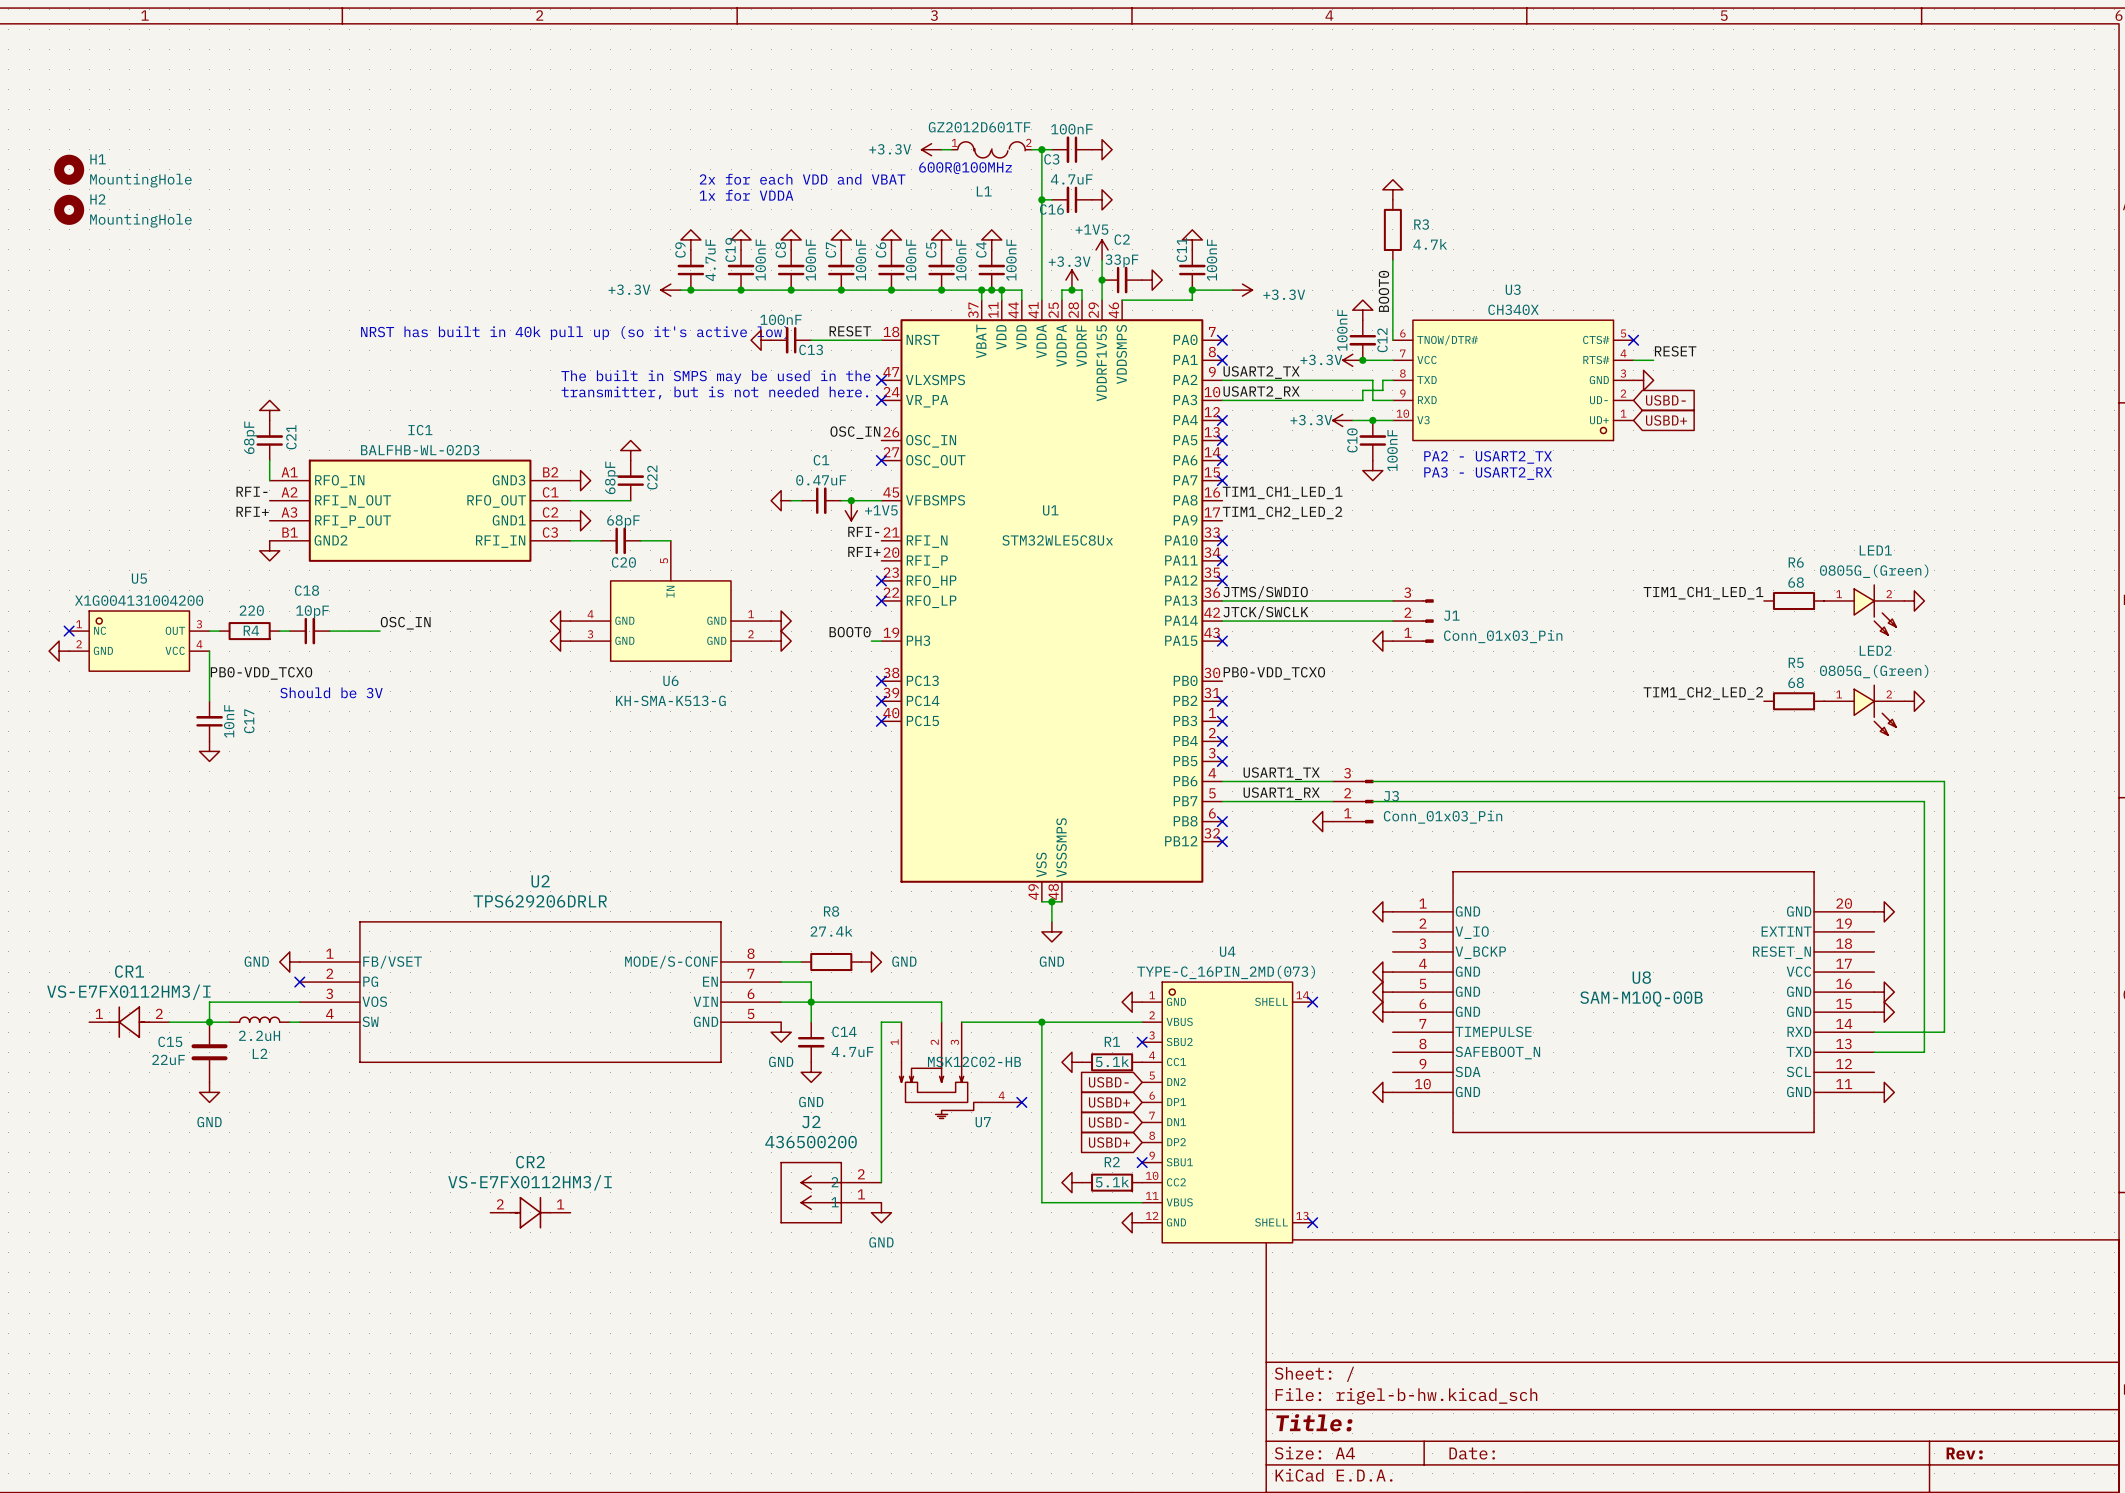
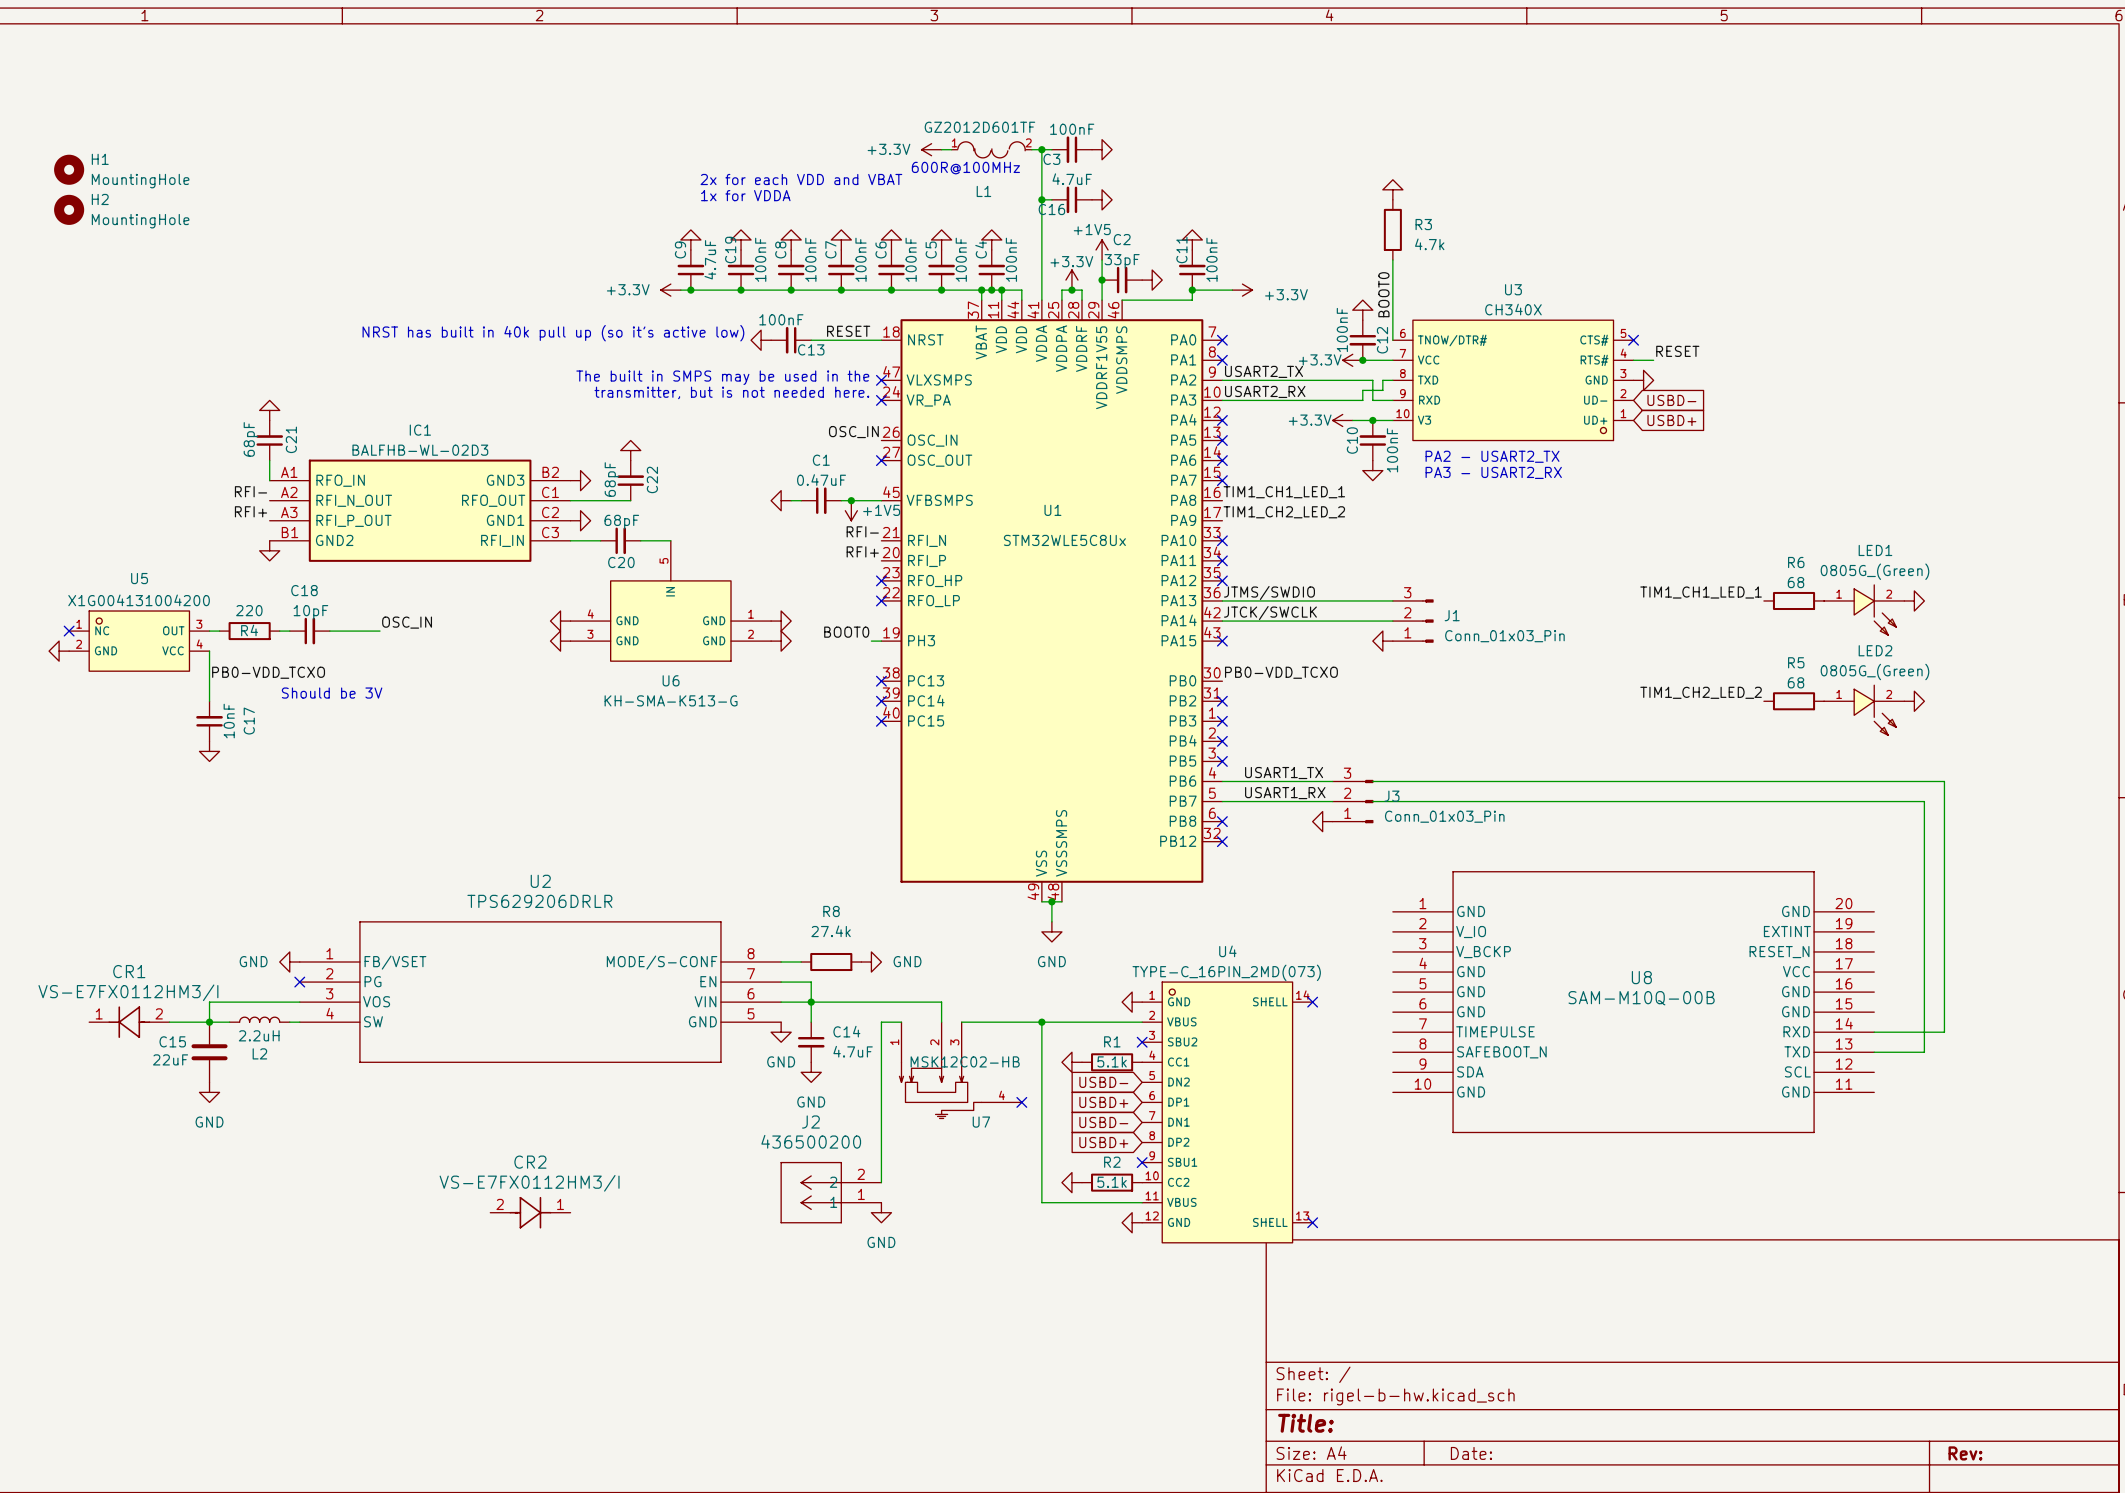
power symbol: (1382, 911) -> none
power symbol: (1884, 911) -> none
power symbol: (1382, 972) -> none
power symbol: (1382, 992) -> none
power symbol: (1884, 992) -> none
power symbol: (1382, 1012) -> none
power symbol: (1884, 1012) -> none
power symbol: (1382, 1092) -> none
power symbol: (1884, 1092) -> none

